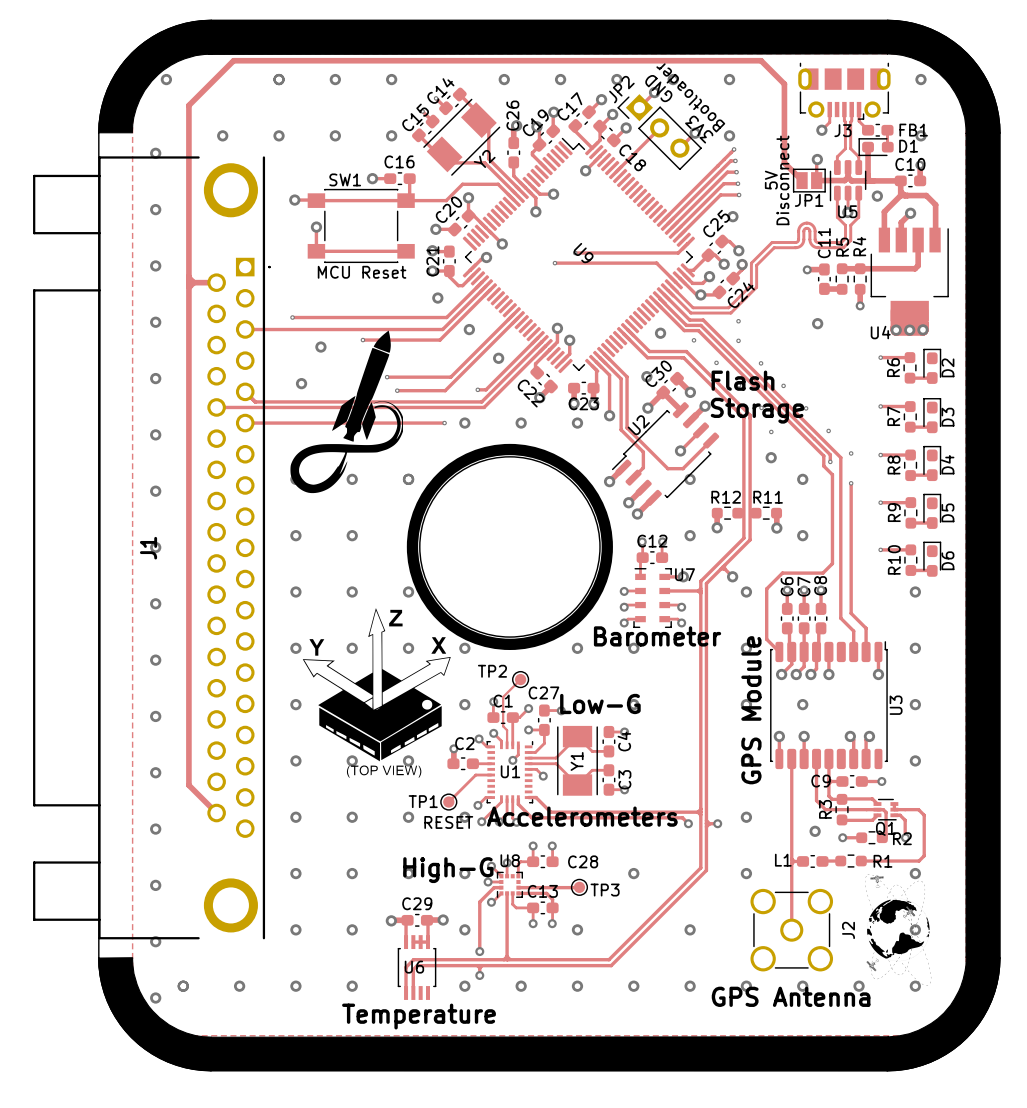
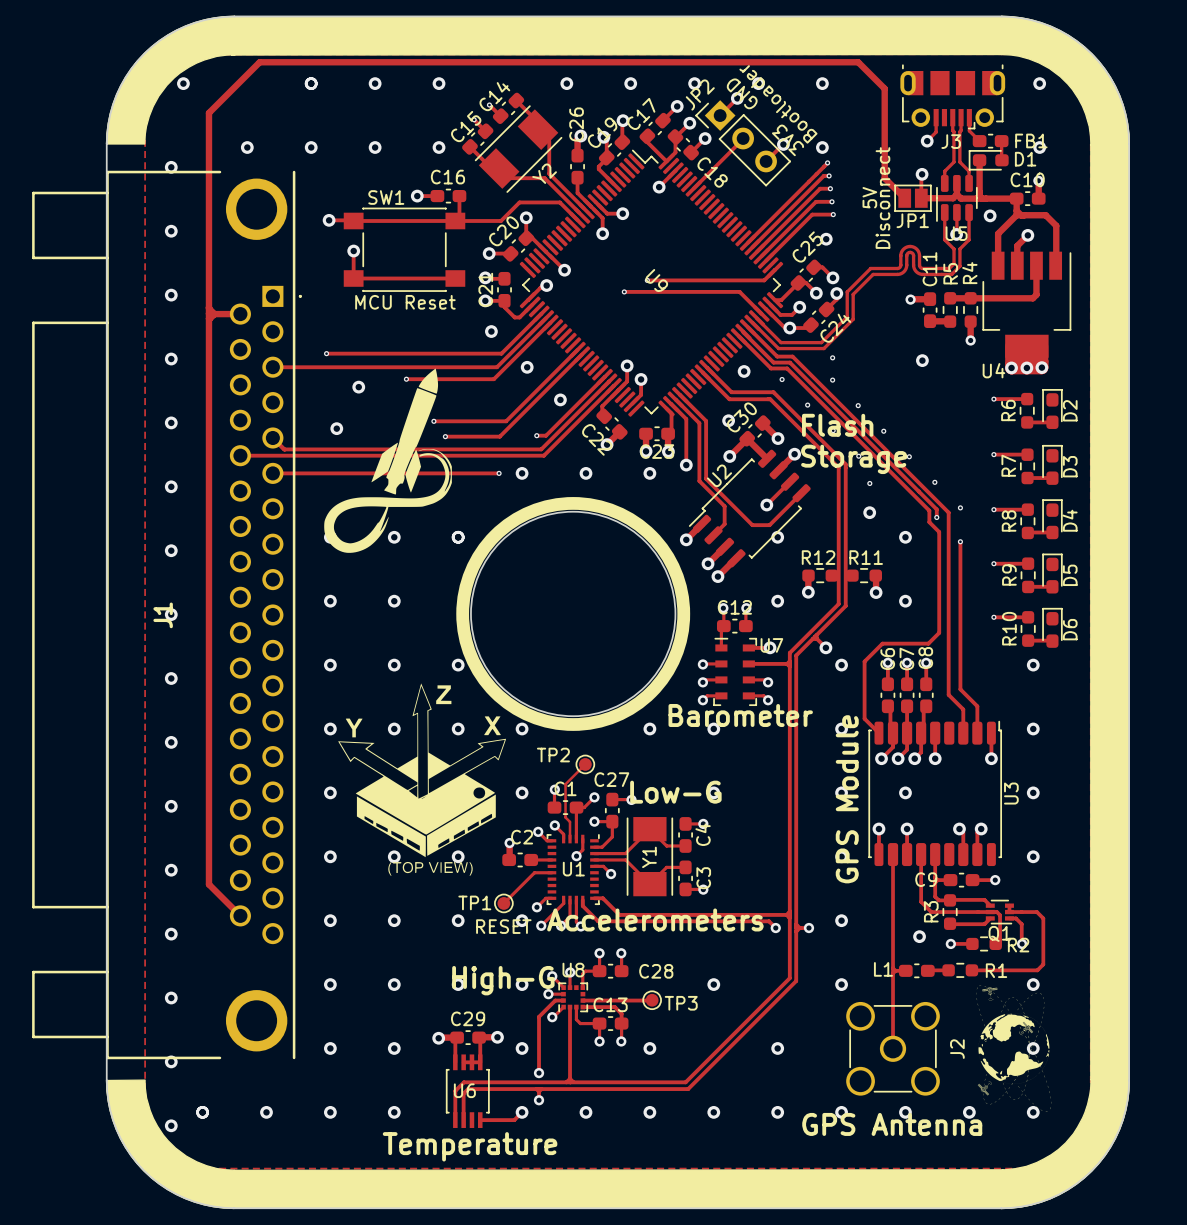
track: none -> (522, 1112) (514, 1120) (480, 1120)

